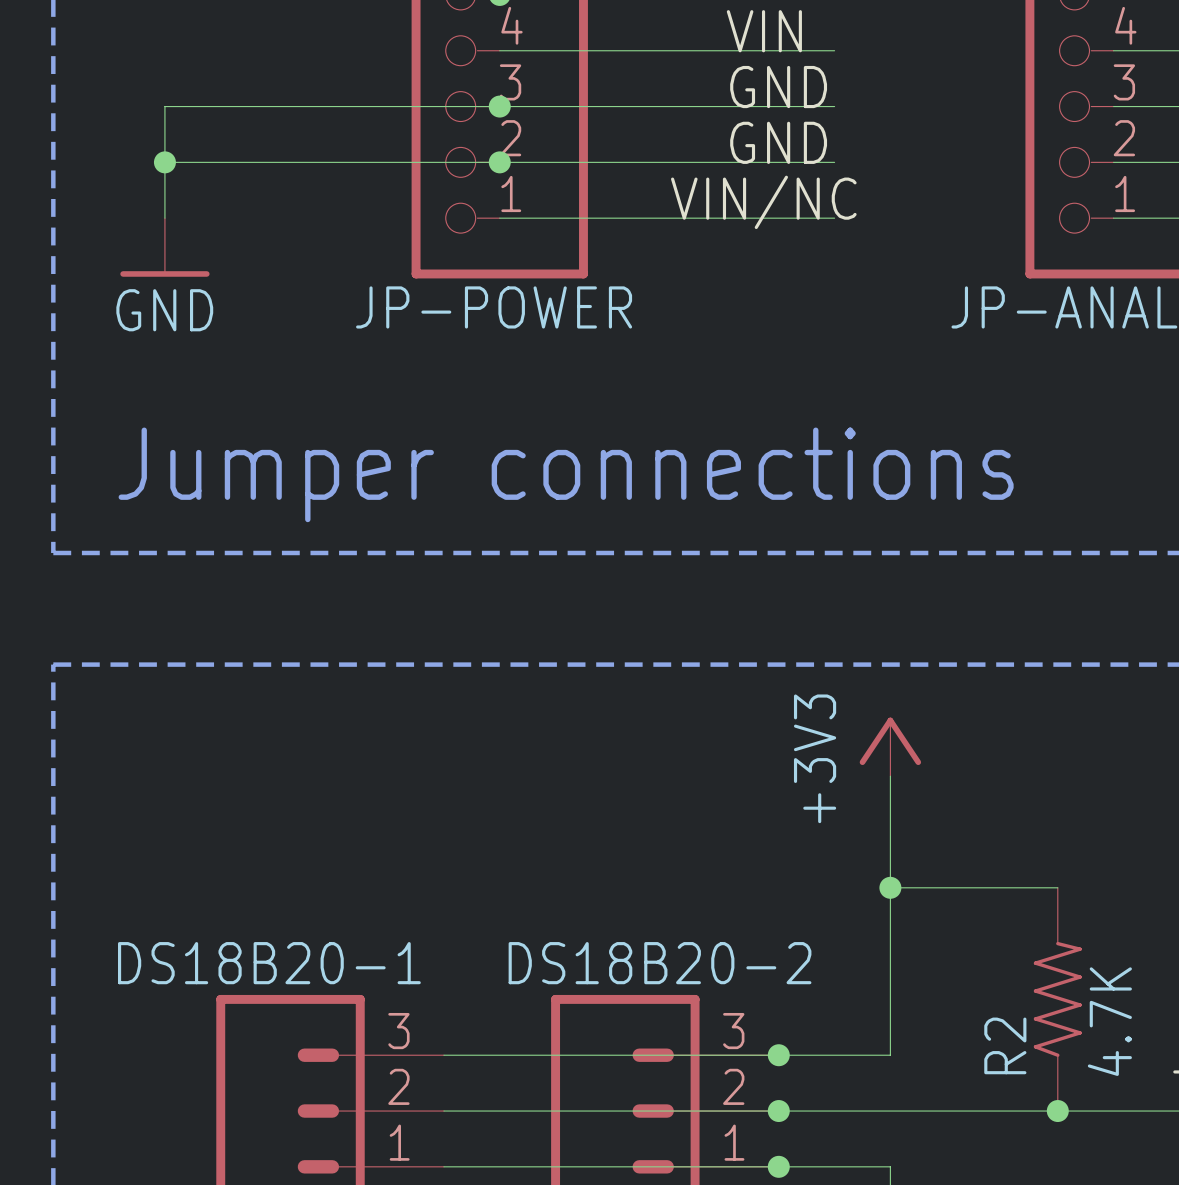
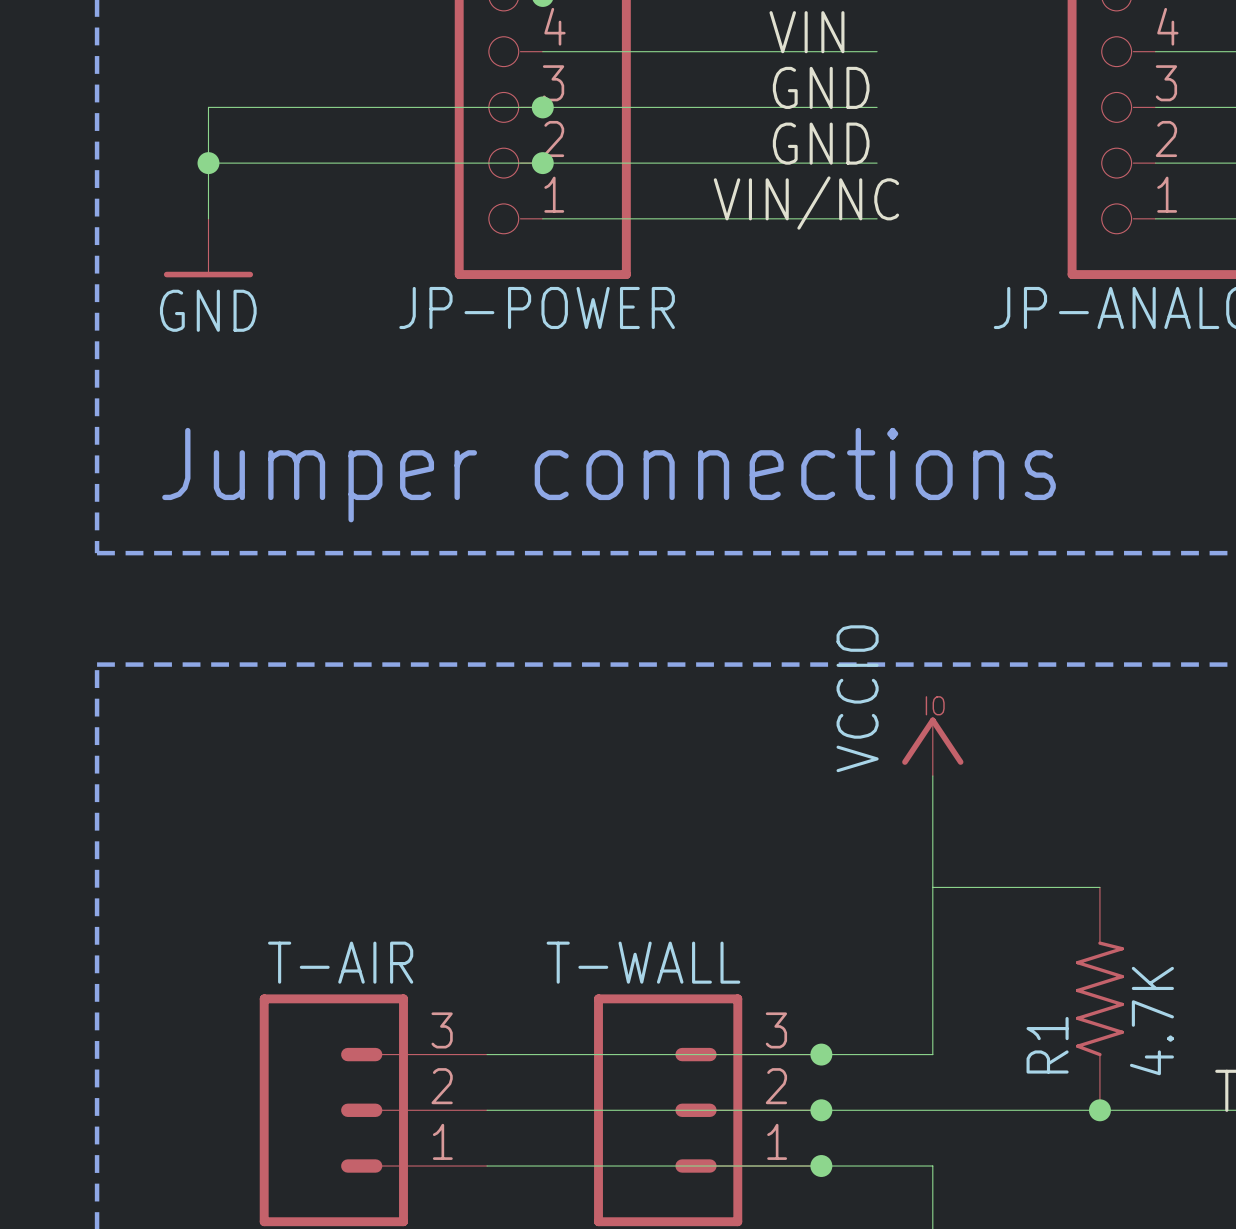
power symbol: +3V3 (890, 746) -> VCCIO (932, 746)
junction: (890, 887) -> none
DS18B20-1 name: DS18B20-1 (269, 963) -> T-AIR (340, 962)
DS18B20-2 name: DS18B20-2 (660, 963) -> T-WALL (643, 962)
R2 name: R2 (1005, 1045) -> R1 (1047, 1045)

